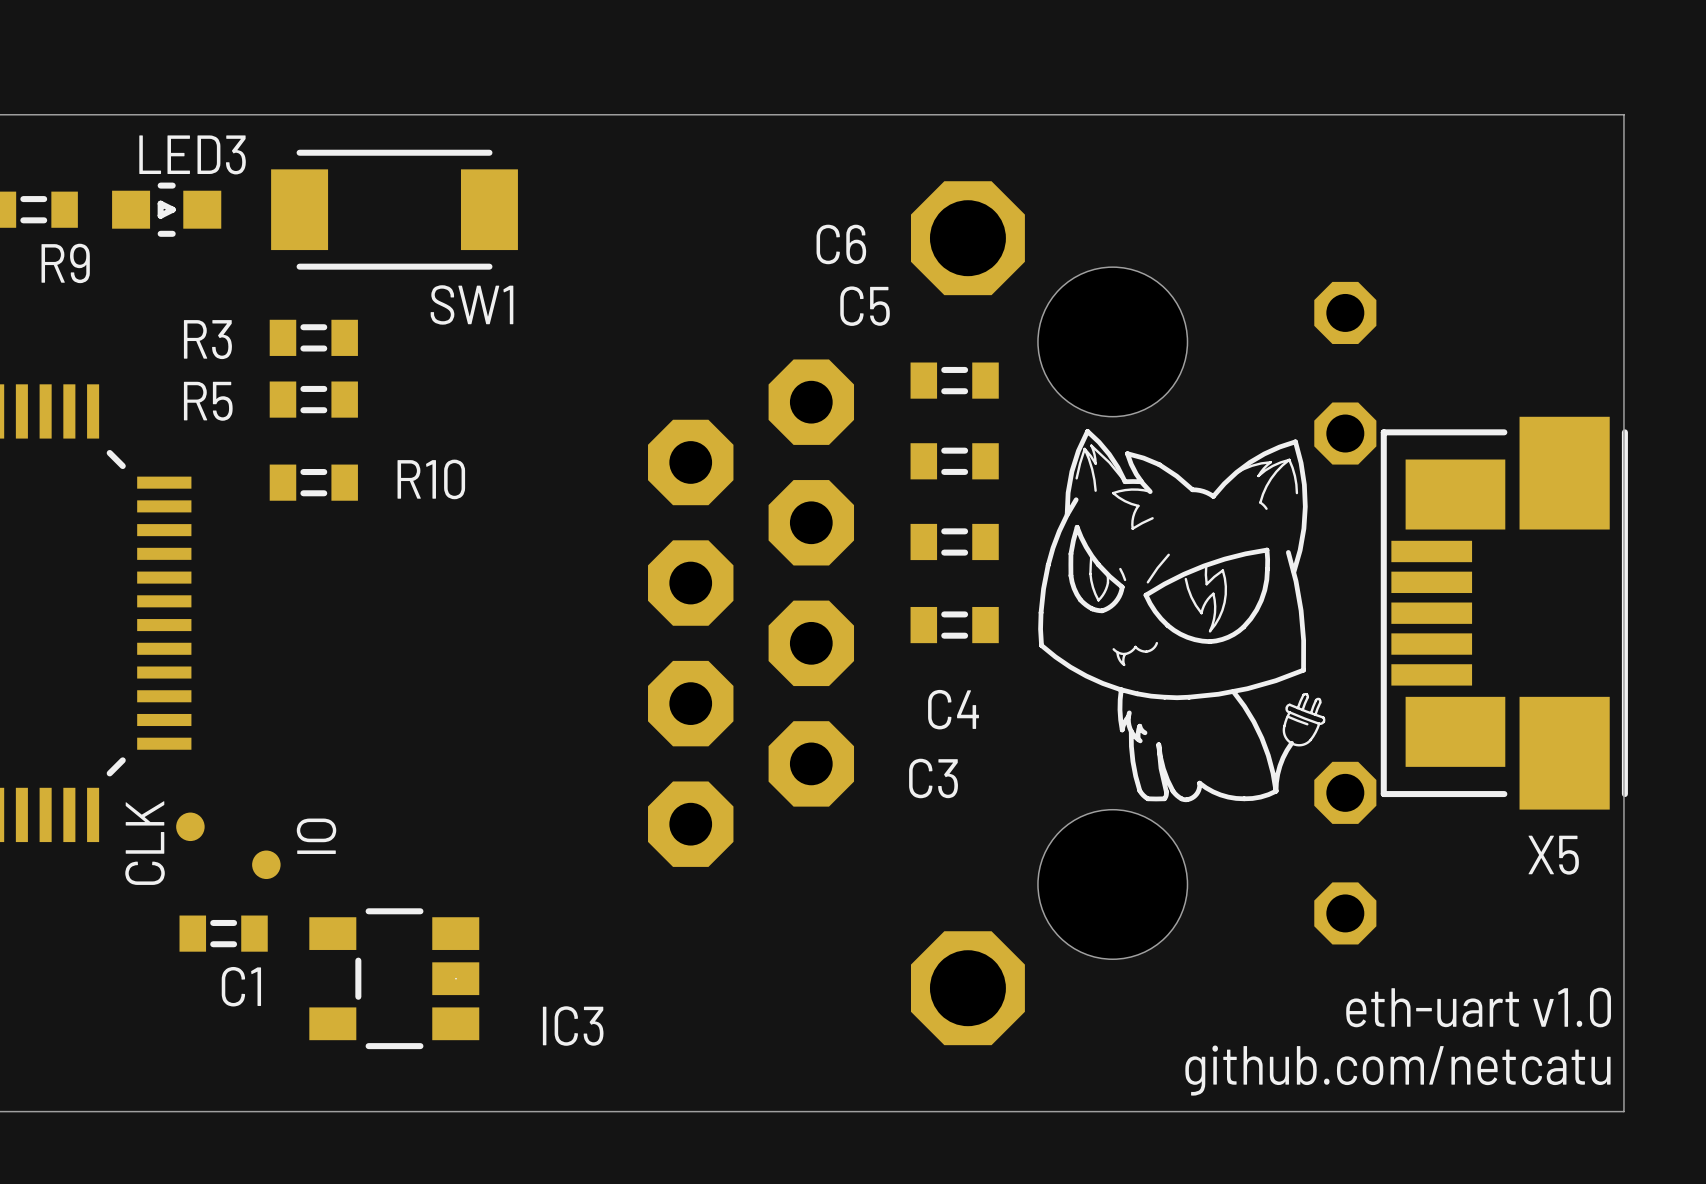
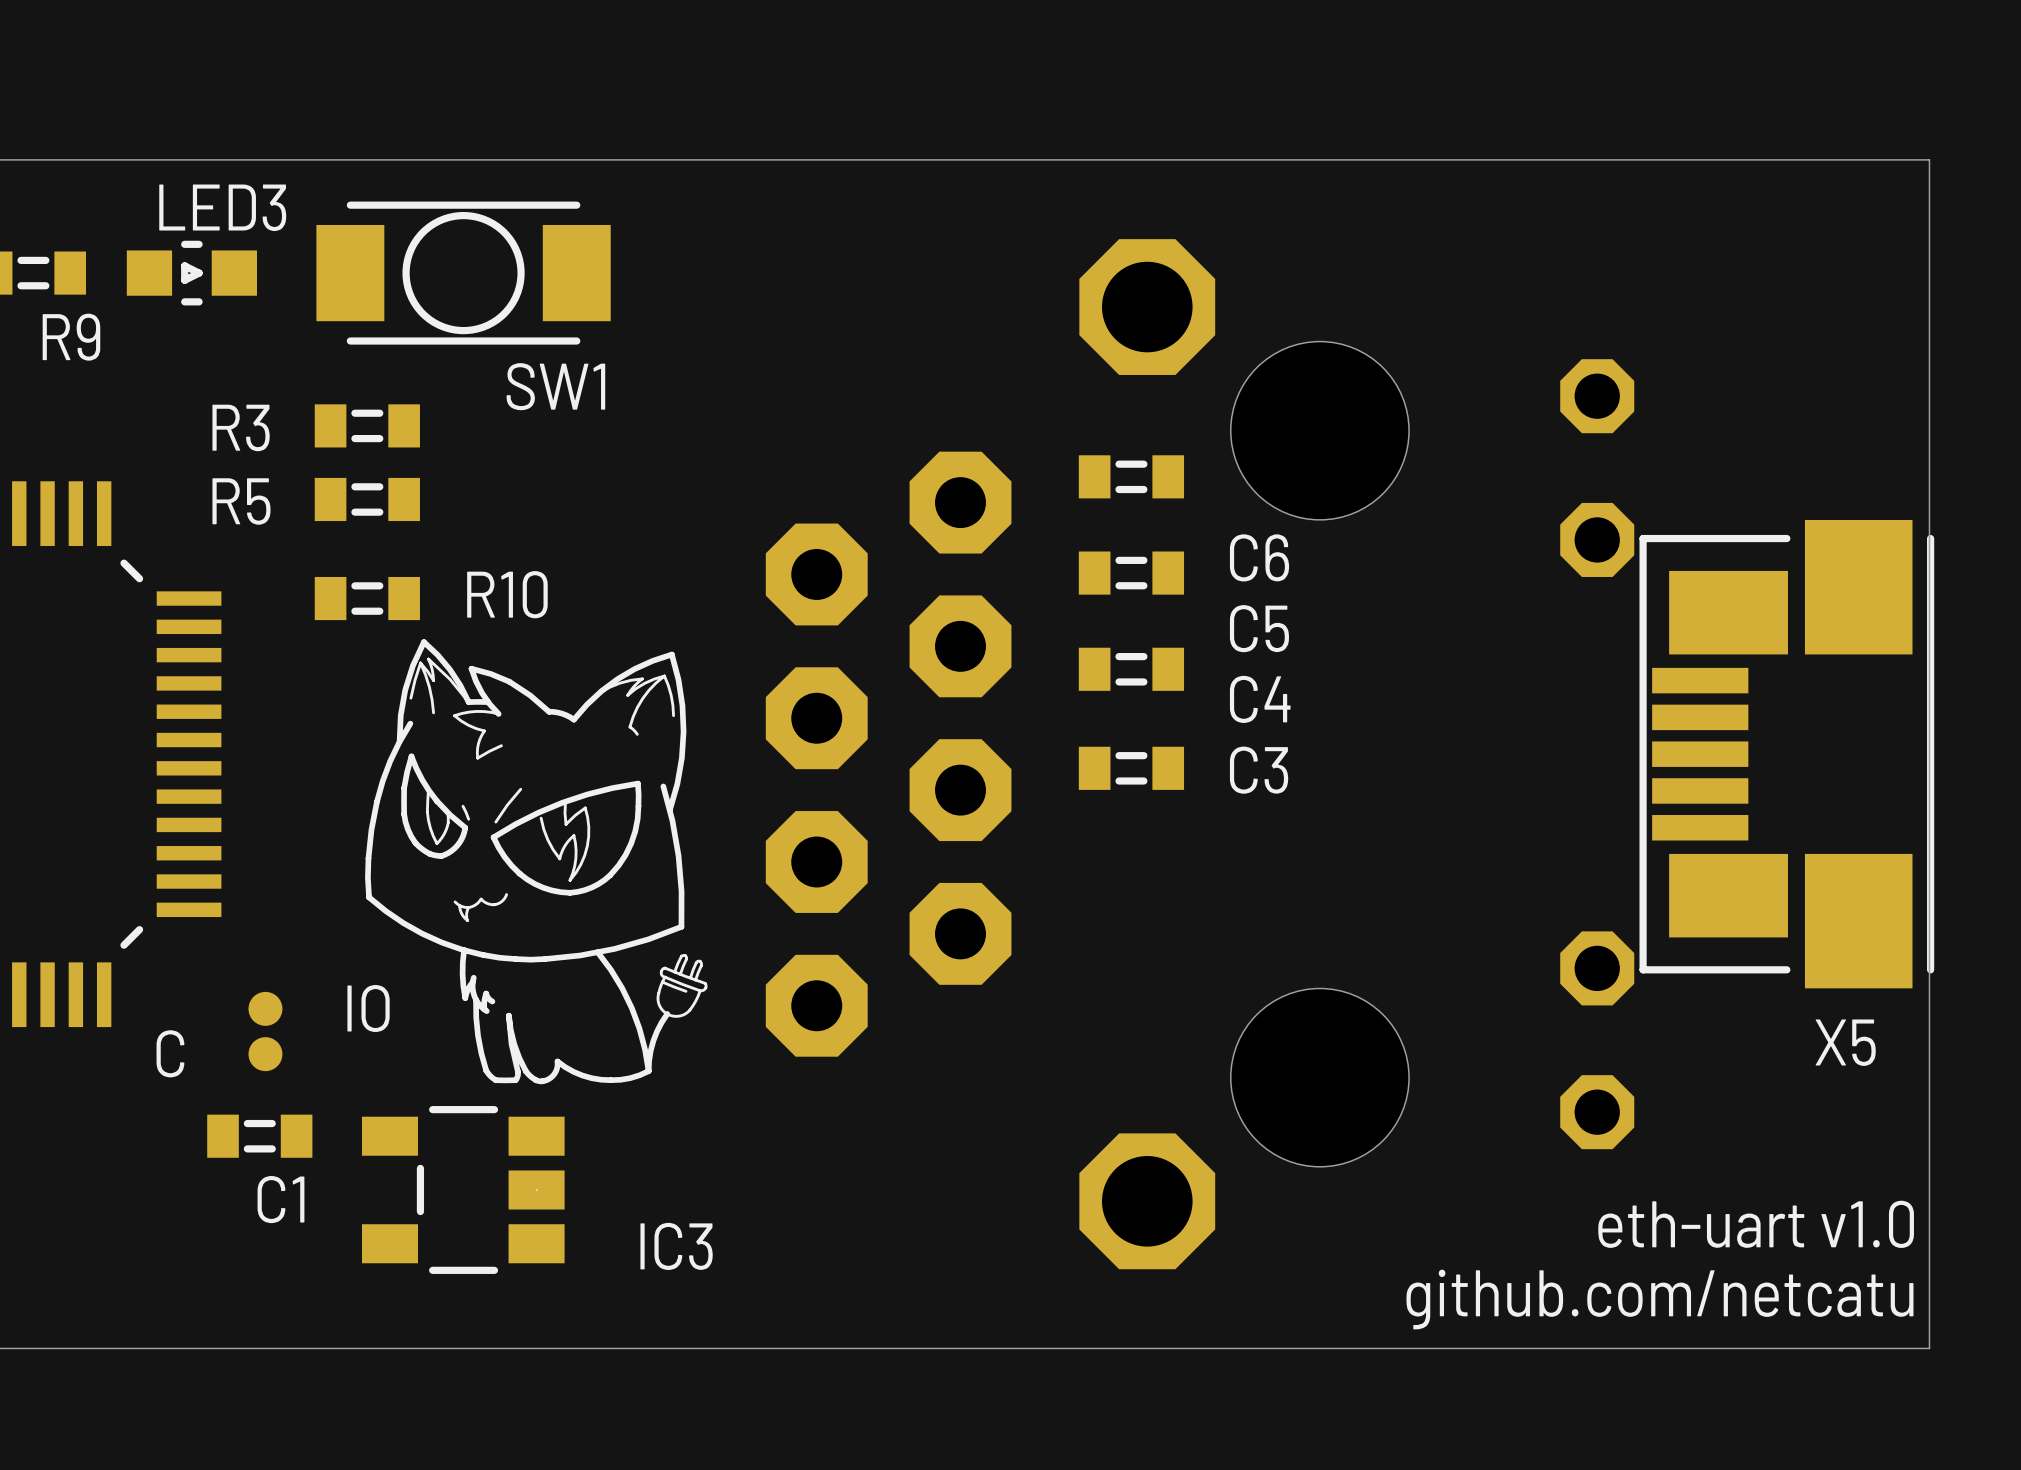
SW1 footprint: [271, 149, 518, 270] -> [316, 201, 611, 345]
C6 name position: C6 (841, 244) -> C6 (1259, 557)
C5 name position: C5 (865, 306) -> C5 (1259, 628)
drawing position: (1181, 615) -> (536, 861)
C4 name position: C4 (953, 709) -> C4 (1260, 699)
C3 name position: C3 (933, 778) -> C3 (1259, 770)
part: CLK (190, 826) -> none
part value rotation: 0° (316, 836) -> 90° clockwise (368, 1008)
part: none -> C (265, 1054)
part position: (266, 864) -> (265, 1008)

